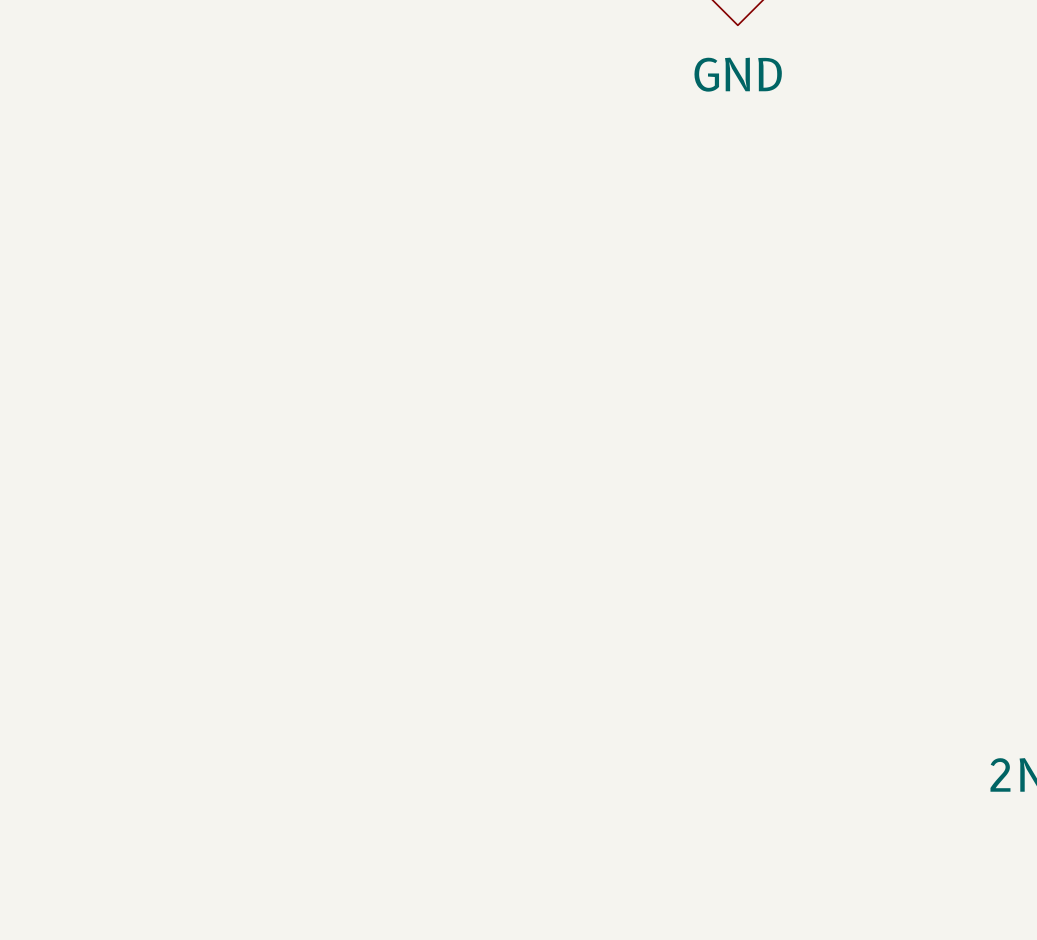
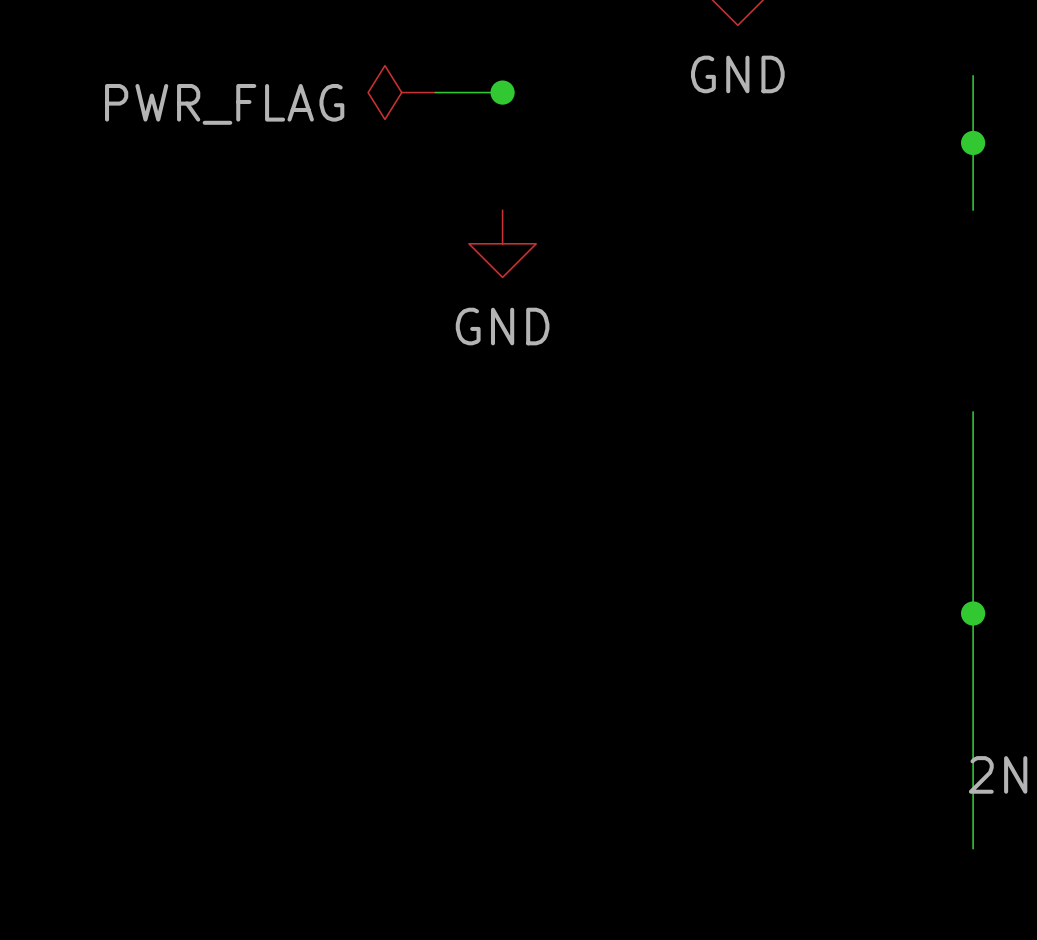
wire: none -> (973, 75) (973, 210)
power symbol: none -> PWR_FLAG (401, 92)
wire: none -> (435, 92) (502, 92)
junction: none -> (502, 92)
junction: none -> (973, 142)
power symbol: none -> GND (502, 243)
wire: none -> (973, 411) (973, 848)
junction: none -> (973, 613)

